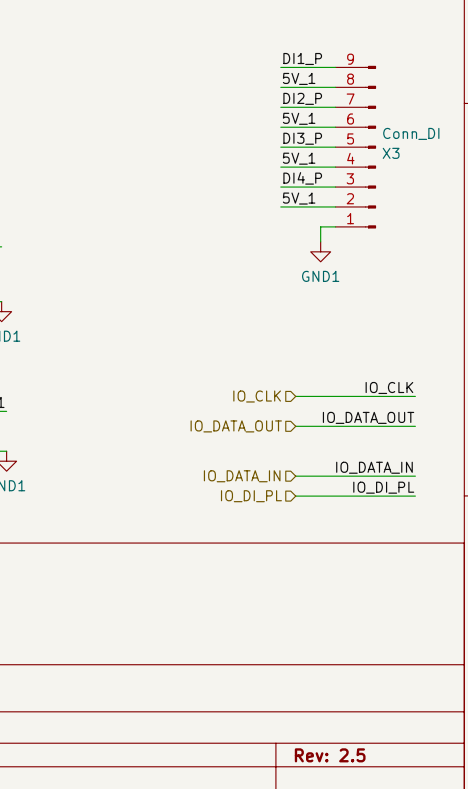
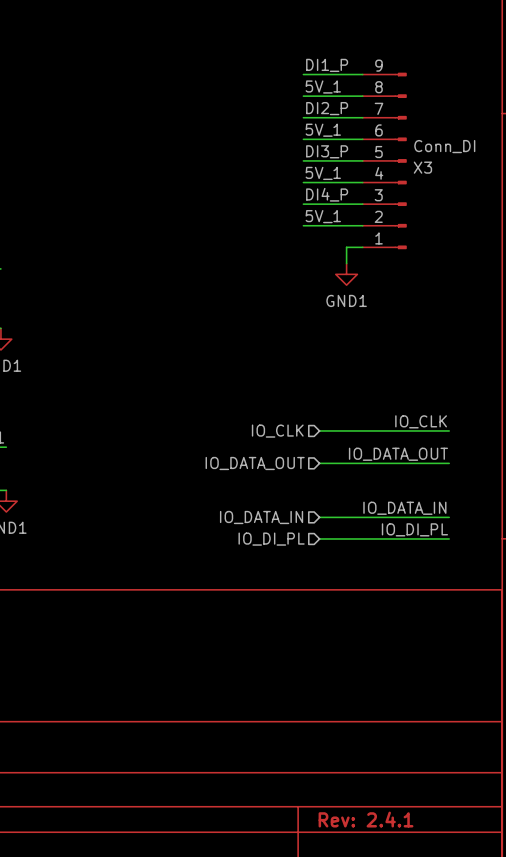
title block: Rev: 2.5 (330, 755) -> Rev: 2.4.1 (366, 819)

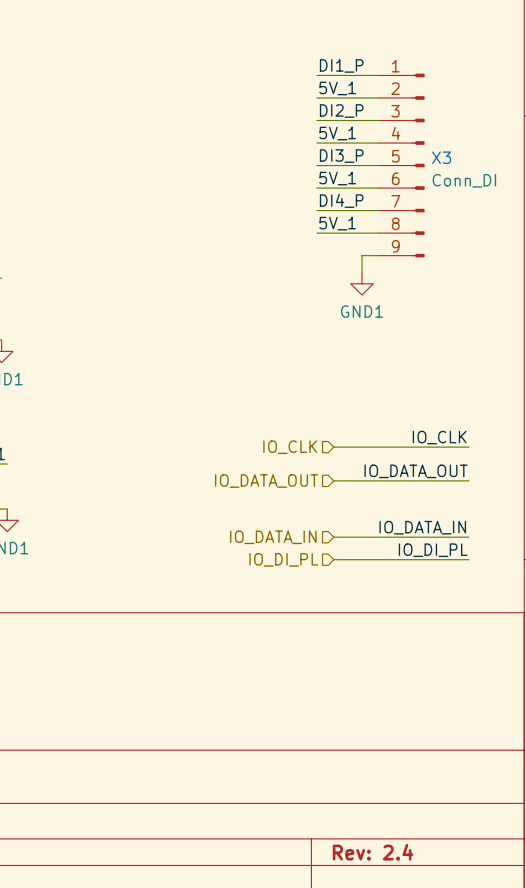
X3 flip: as is (400, 160) -> up-down (418, 165)
title block: Rev: 2.4.1 (366, 819) -> Rev: 2.4 (373, 852)

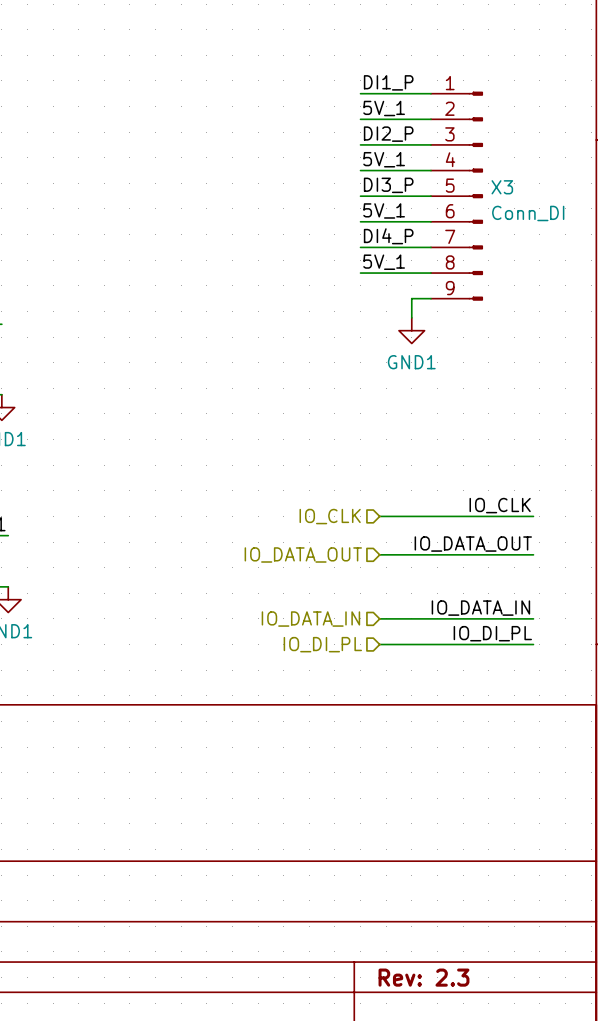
title block: Rev: 2.4 (373, 852) -> Rev: 2.3 (423, 977)

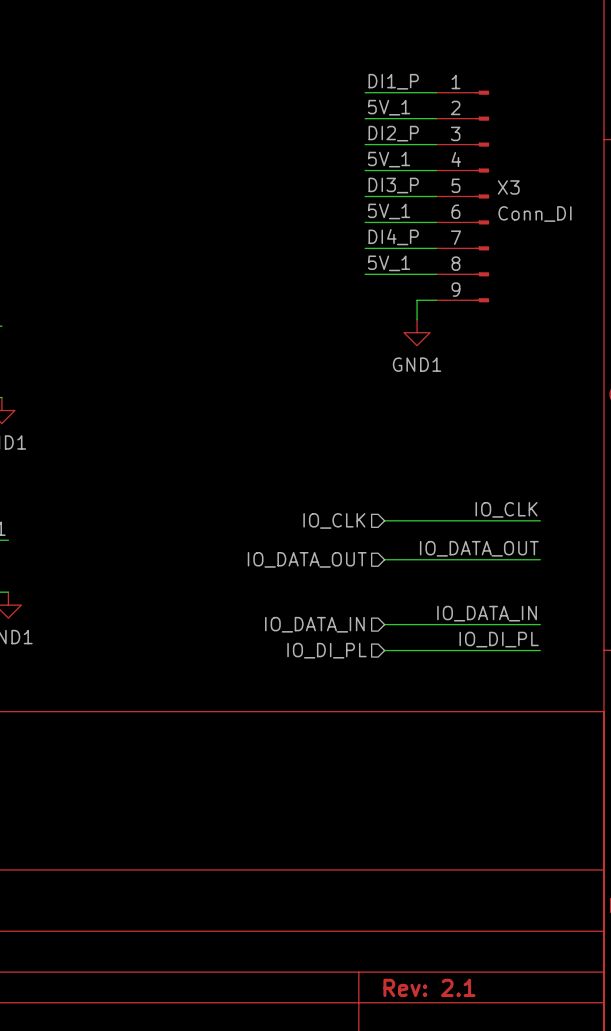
title block: Rev: 2.3 (423, 977) -> Rev: 2.1 (429, 987)

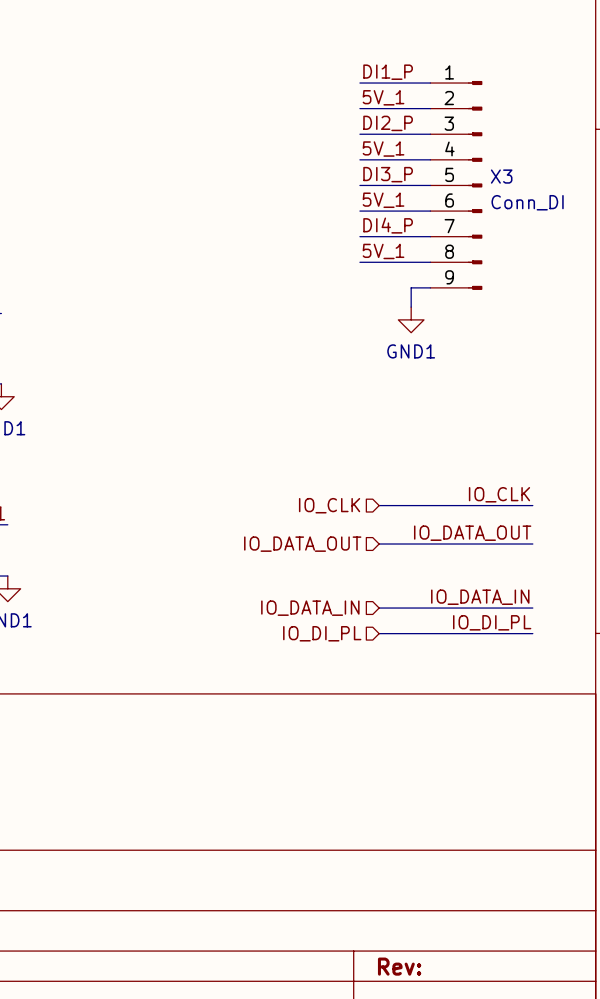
title block: Rev: 2.1 (429, 987) -> Rev: (399, 966)

